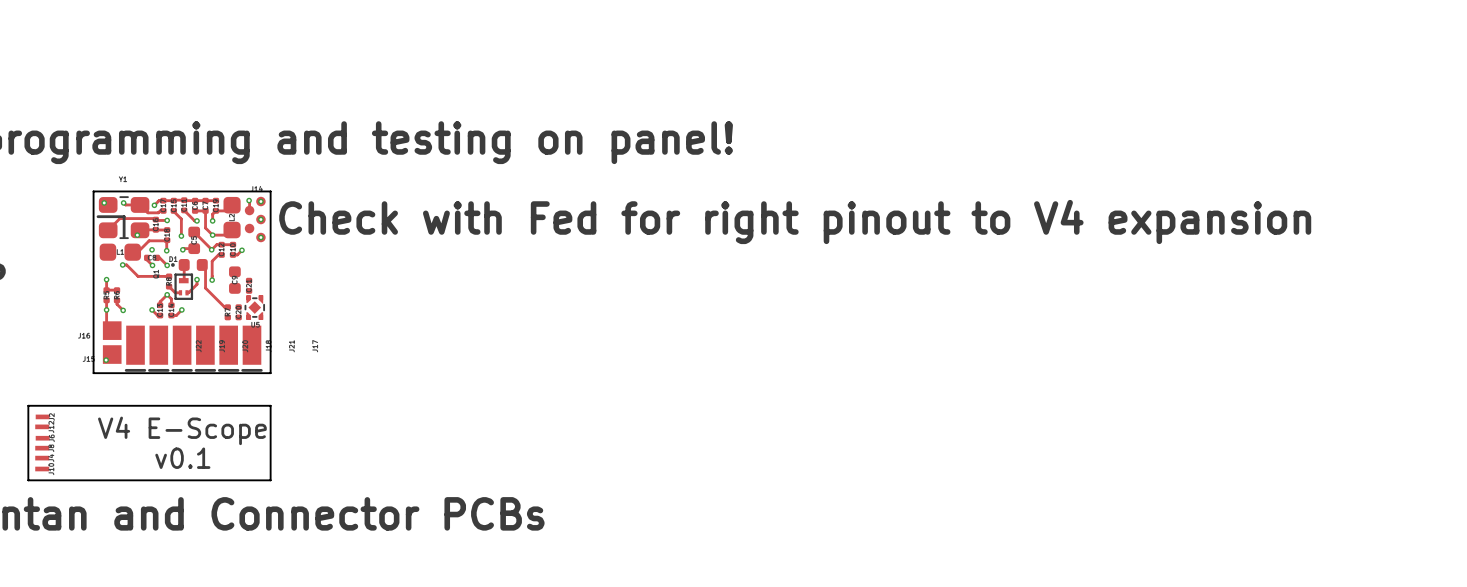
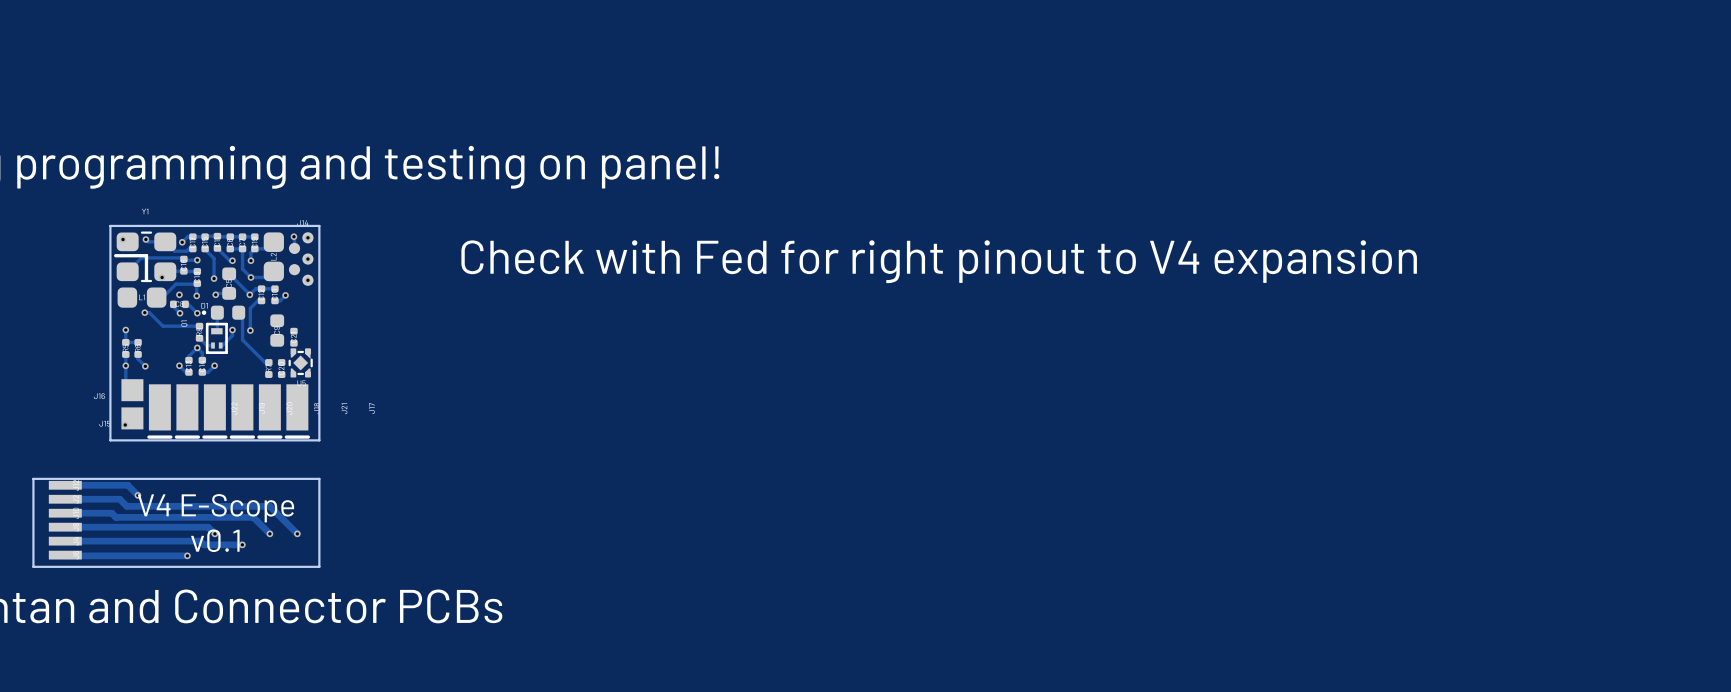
track: none -> (65, 485) (127, 485) (137, 495)
part footprint: [35, 414, 50, 420] -> [48, 494, 82, 504]
via: none -> (137, 495)
track: none -> (65, 499) (119, 499) (126, 506) (269, 506) (297, 533)
part footprint: [35, 424, 50, 430] -> [48, 480, 82, 490]
track: none -> (65, 513) (111, 513) (115, 517) (253, 517) (269, 533)
part footprint: [35, 435, 50, 441] -> [48, 550, 82, 560]
part footprint: [35, 445, 50, 451] -> [48, 522, 82, 532]
track: none -> (65, 527) (208, 527) (214, 533)
via: none -> (214, 533)
via: none -> (269, 533)
via: none -> (297, 533)
part footprint: [35, 455, 50, 461] -> [48, 536, 82, 546]
track: none -> (65, 541) (200, 541) (203, 544) (242, 544)
via: none -> (242, 544)
part footprint: [35, 466, 50, 472] -> [48, 508, 82, 518]
track: none -> (65, 555) (187, 555)
via: none -> (187, 555)

